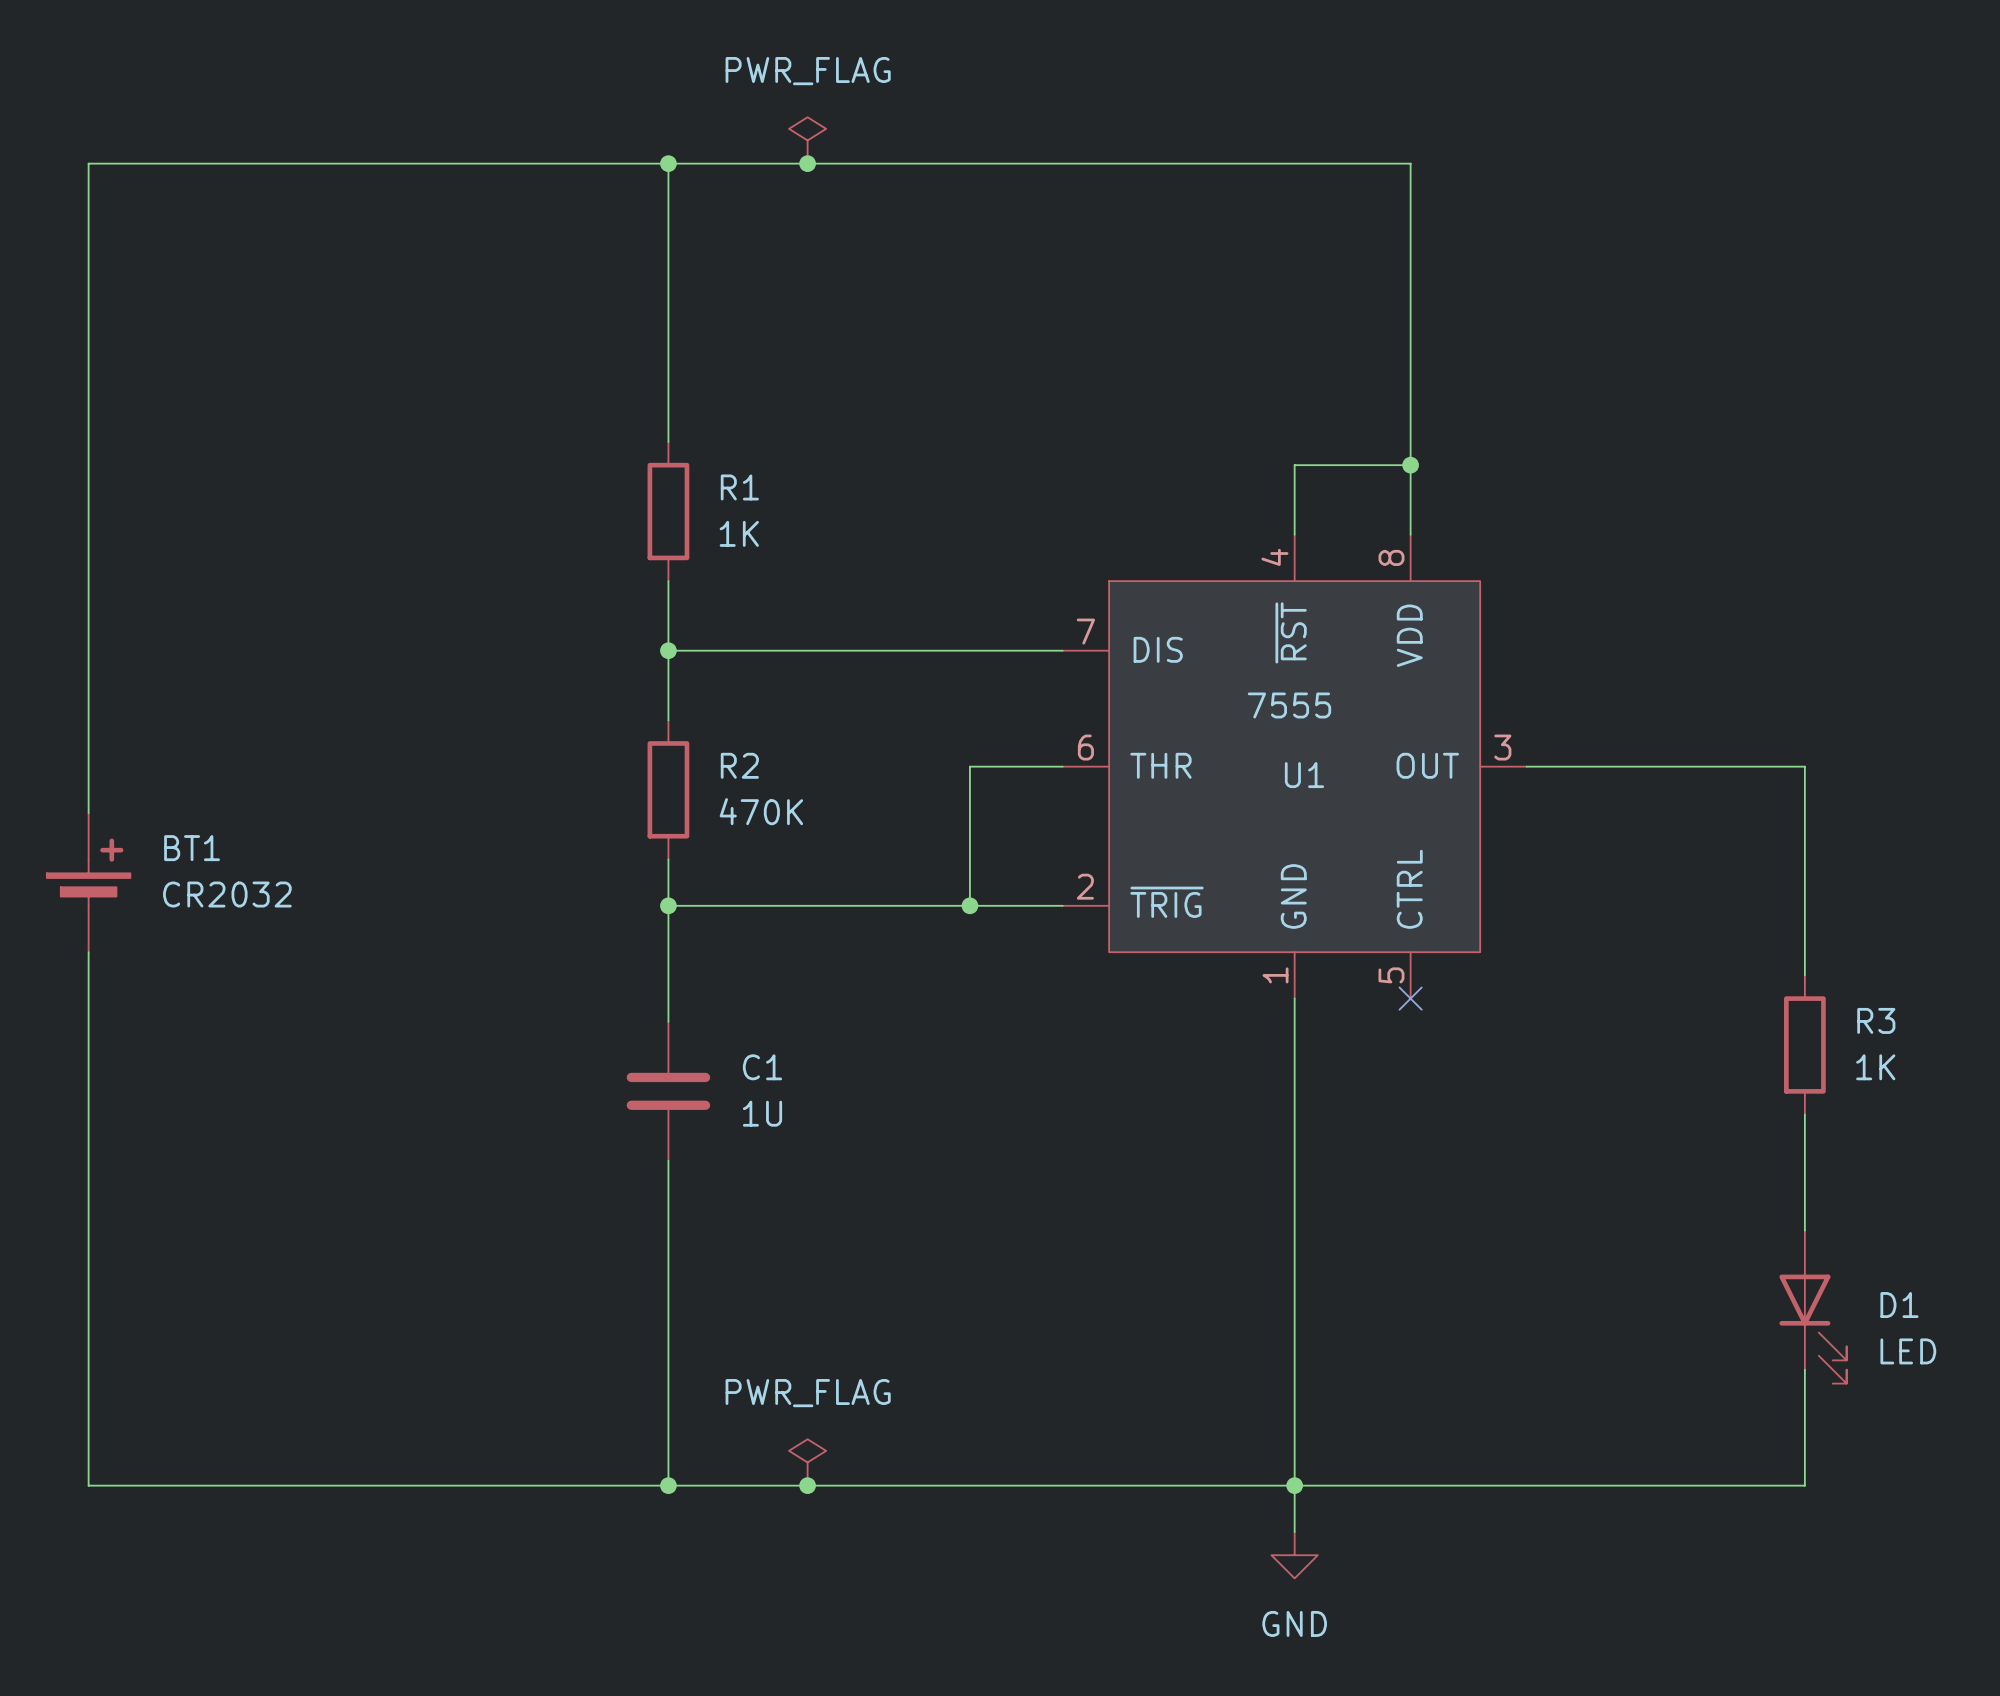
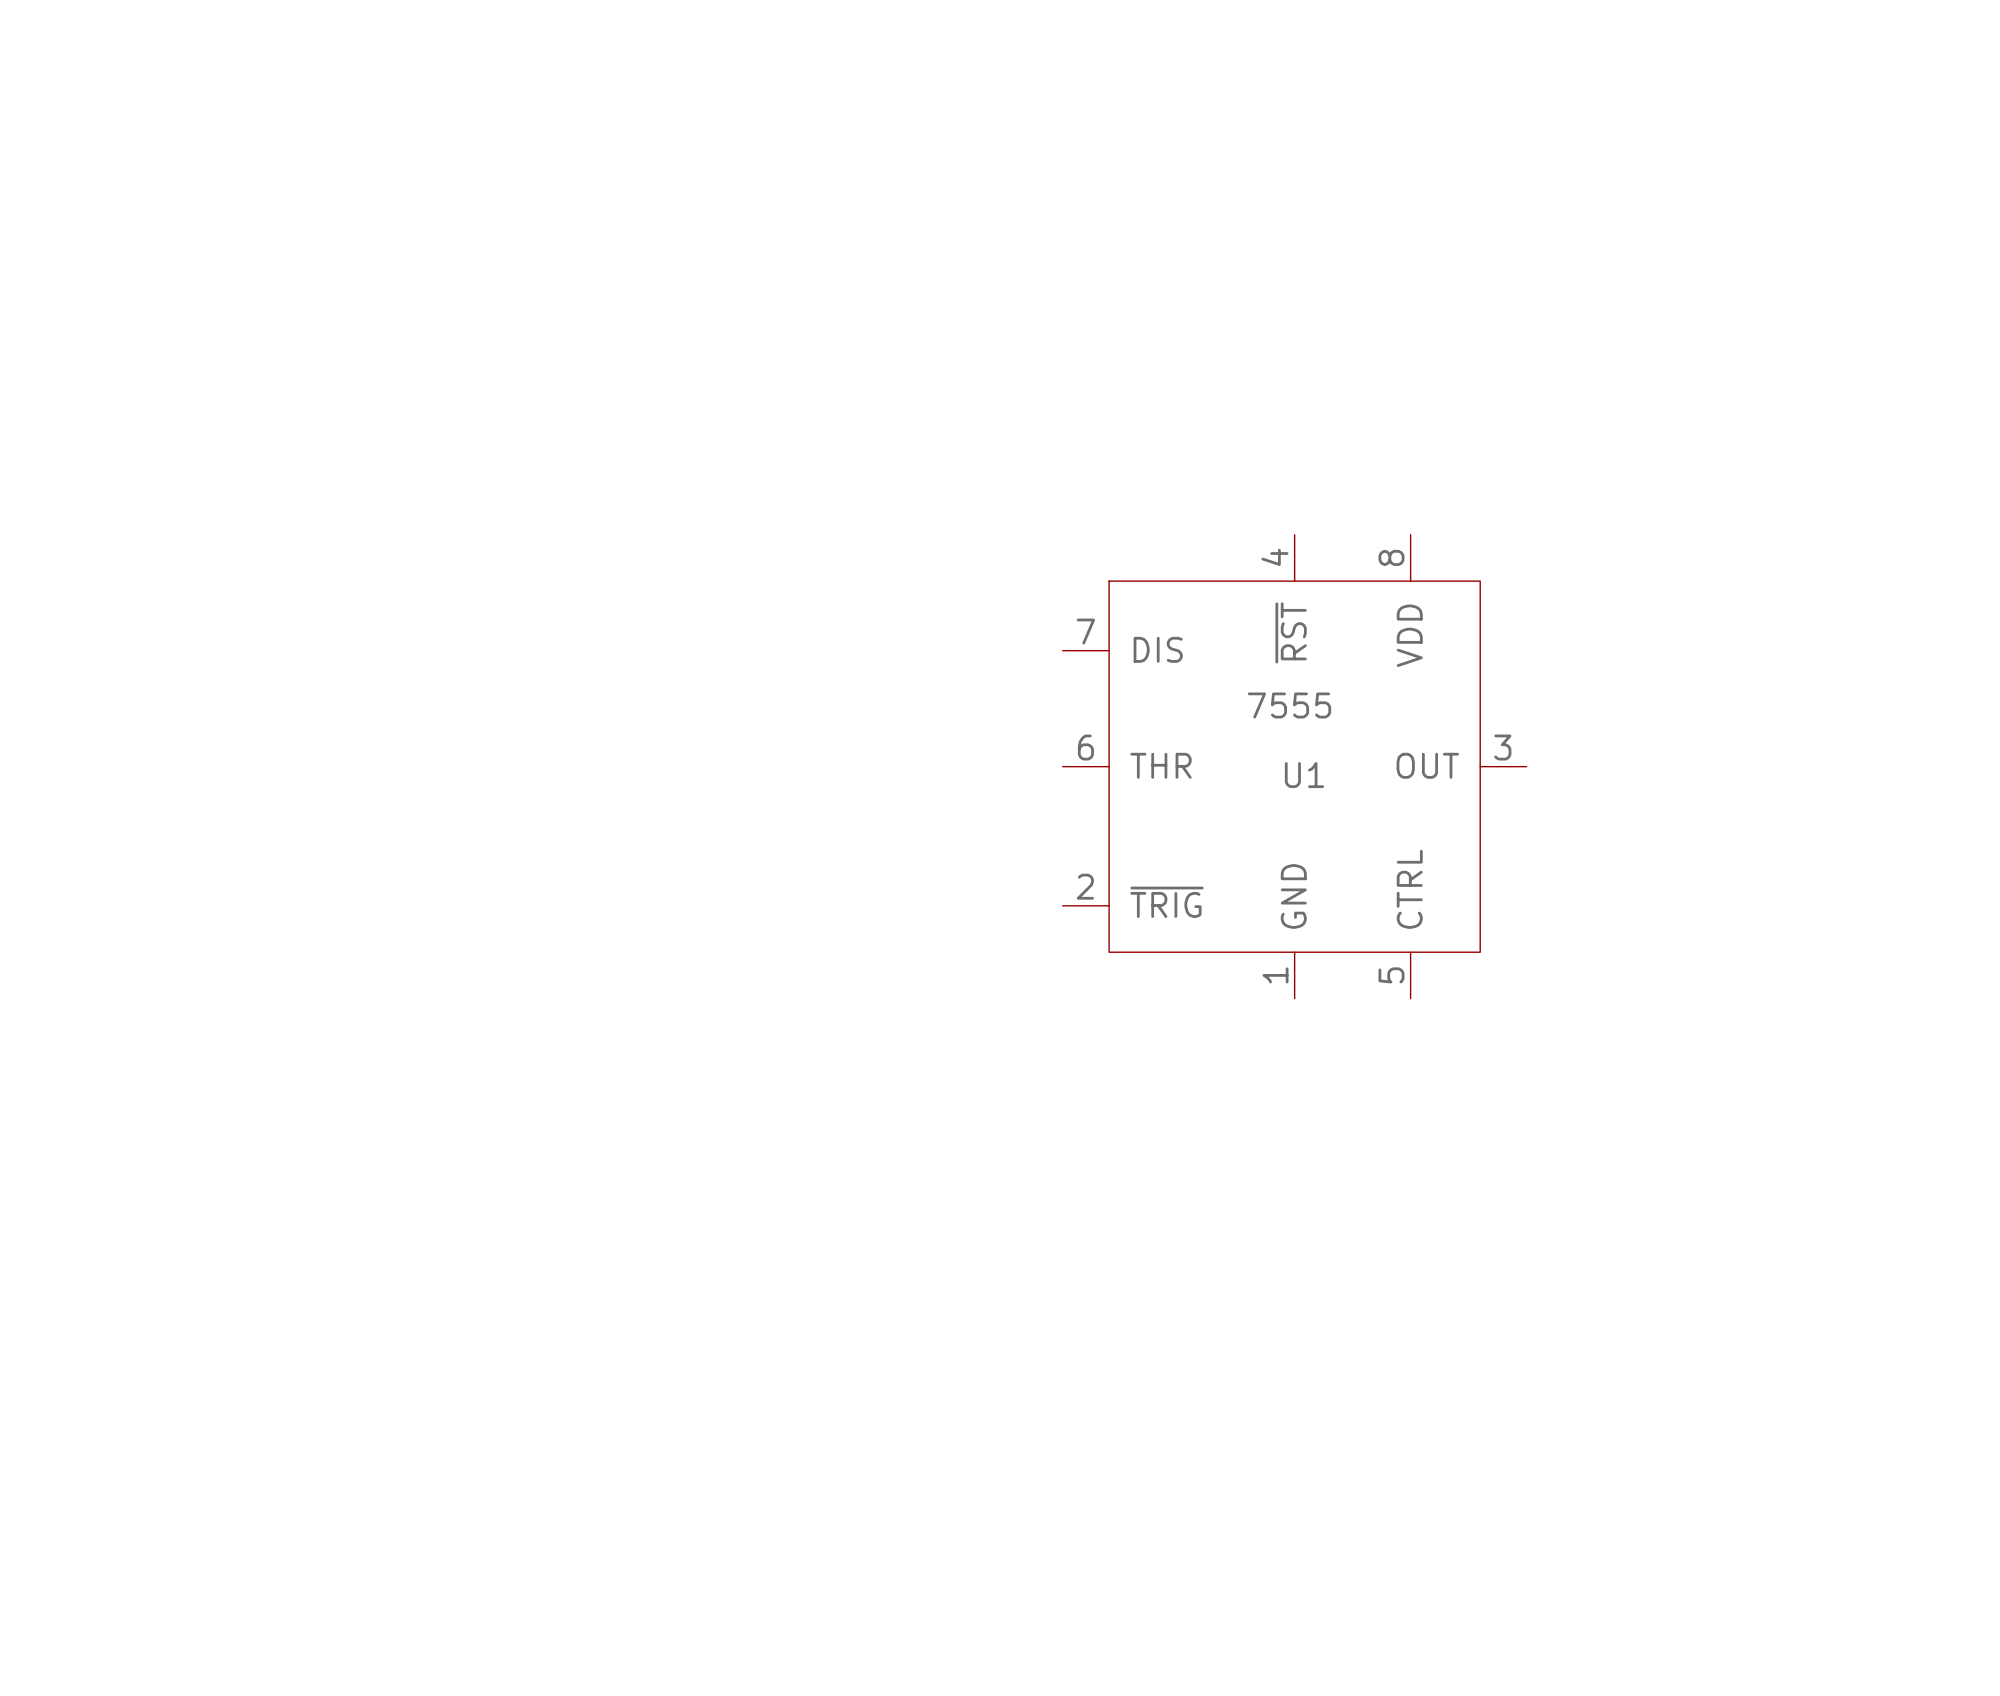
power symbol: PWR_FLAG (807, 140) -> none
wire: (668, 163) (668, 441) -> none
junction: (668, 163) -> none
junction: (807, 163) -> none
wire: (1410, 465) (1294, 465) (1294, 534) -> none
junction: (1410, 465) -> none
R1: 1K (668, 511) -> none
wire: (1410, 534) (1410, 163) (88, 163) (88, 813) -> none
wire: (668, 581) (668, 720) -> none
wire: (668, 650) (1062, 650) -> none
junction: (668, 650) -> none
wire: (1062, 766) (969, 766) (969, 905) -> none
wire: (1526, 766) (1804, 766) (1804, 975) -> none
R2: 470K (668, 789) -> none
wire: (668, 859) (668, 1021) -> none
BT1: CR2032 (88, 882) -> none
wire: (668, 905) (1062, 905) -> none
junction: (668, 905) -> none
junction: (969, 905) -> none
wire: (88, 952) (88, 1485) (1804, 1485) (1804, 1369) -> none
wire: (1294, 998) (1294, 1532) -> none
no-connect mark: (1410, 998) -> none
R3: 1K (1804, 1044) -> none
C1: 1U (668, 1091) -> none
wire: (1804, 1114) (1804, 1230) -> none
wire: (668, 1160) (668, 1485) -> none
D1: LED (1813, 1307) -> none
power symbol: PWR_FLAG (807, 1462) -> none
junction: (668, 1485) -> none
junction: (807, 1485) -> none
junction: (1294, 1485) -> none
power symbol: GND (1294, 1555) -> none

